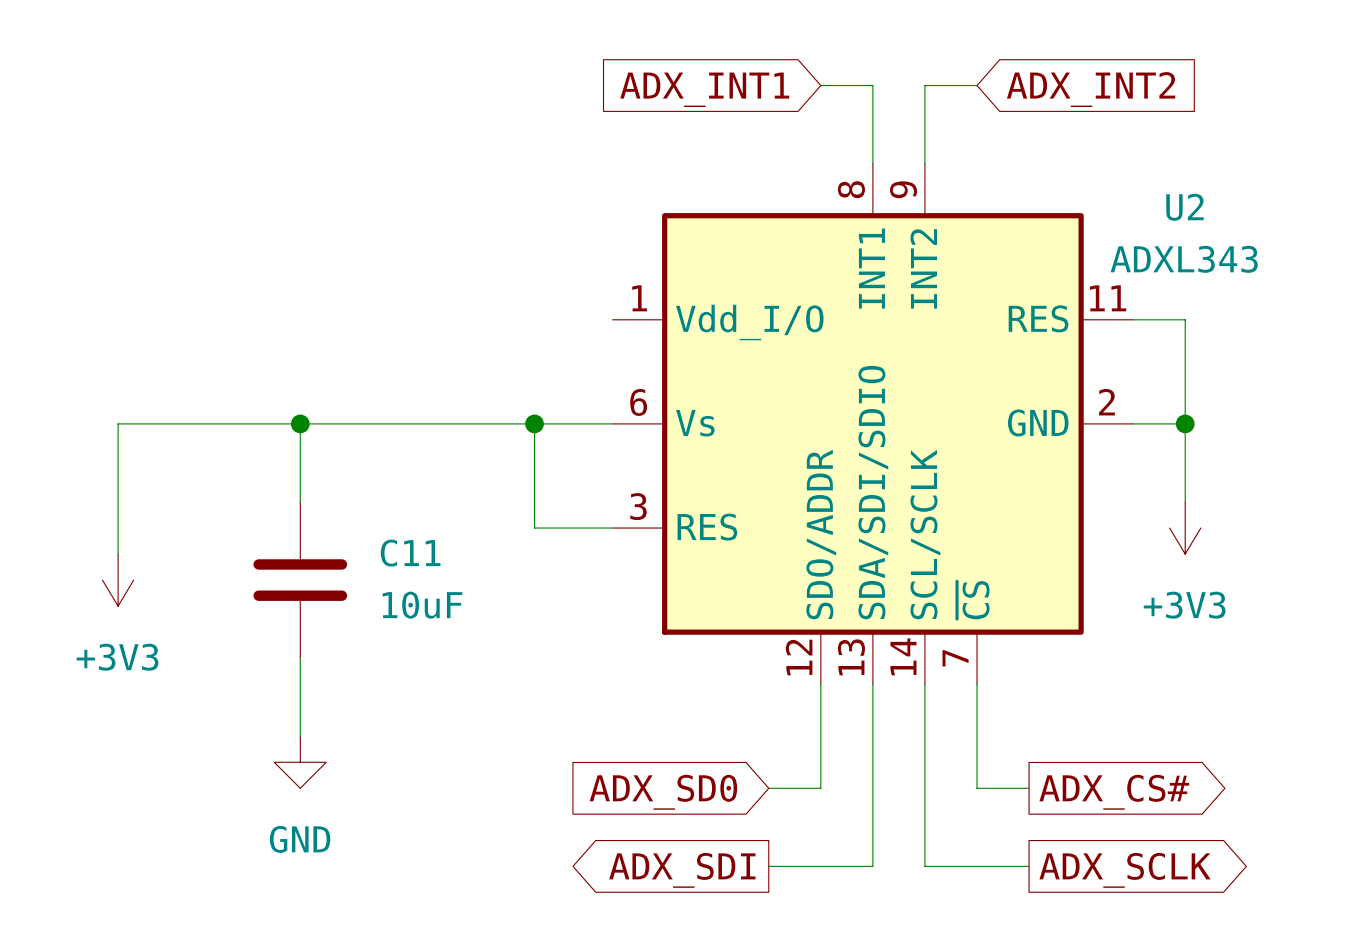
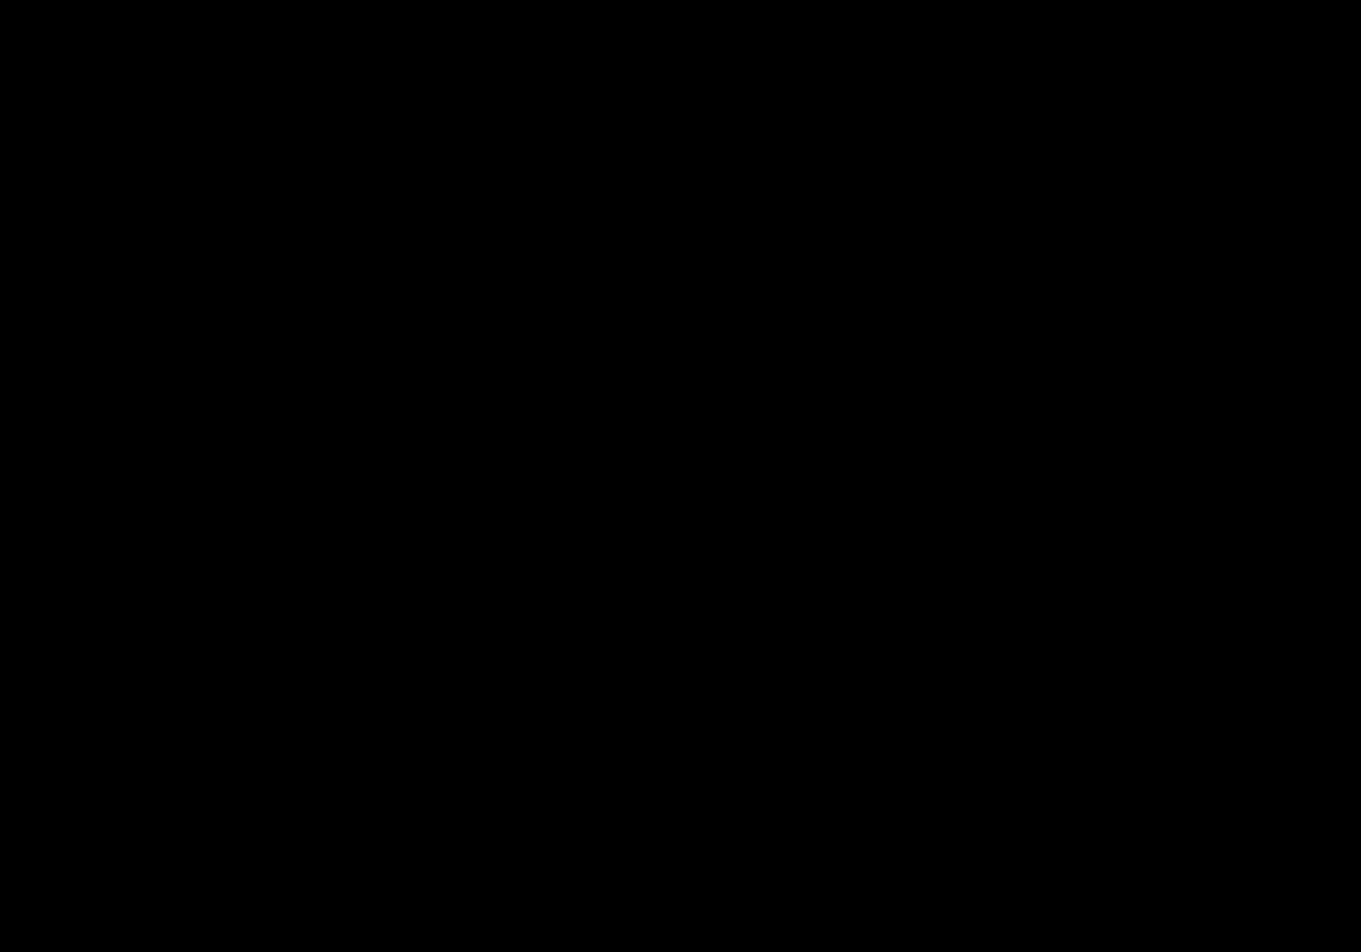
wire: (820, 85) (872, 85) (872, 163) -> none
wire: (977, 85) (924, 85) (924, 163) -> none
global label: ADX_INT1 (704, 89) -> none
global label: ADX_INT2 (1091, 89) -> none
wire: (1133, 319) (1185, 319) (1185, 502) -> none
wire: (300, 423) (300, 502) -> none
junction: (300, 423) -> none
wire: (534, 423) (534, 528) (612, 528) -> none
junction: (534, 423) -> none
wire: (612, 423) (118, 423) (118, 554) -> none
U2: ADXL343 (872, 423) -> none
wire: (1133, 423) (1185, 423) -> none
junction: (1185, 423) -> none
power symbol: +3V3 (1185, 528) -> none
power symbol: +3V3 (118, 580) -> none
C11: 10uF (300, 580) -> none
wire: (300, 658) (300, 736) -> none
wire: (820, 684) (820, 788) (768, 788) -> none
wire: (872, 684) (872, 866) (768, 866) -> none
wire: (924, 684) (924, 866) (1029, 866) -> none
wire: (977, 684) (977, 788) (1029, 788) -> none
power symbol: GND (300, 762) -> none
global label: ADX_SD0 (663, 792) -> none
global label: ADX_CS# (1114, 792) -> none
global label: ADX_SDI (682, 870) -> none
global label: ADX_SCLK (1125, 870) -> none

